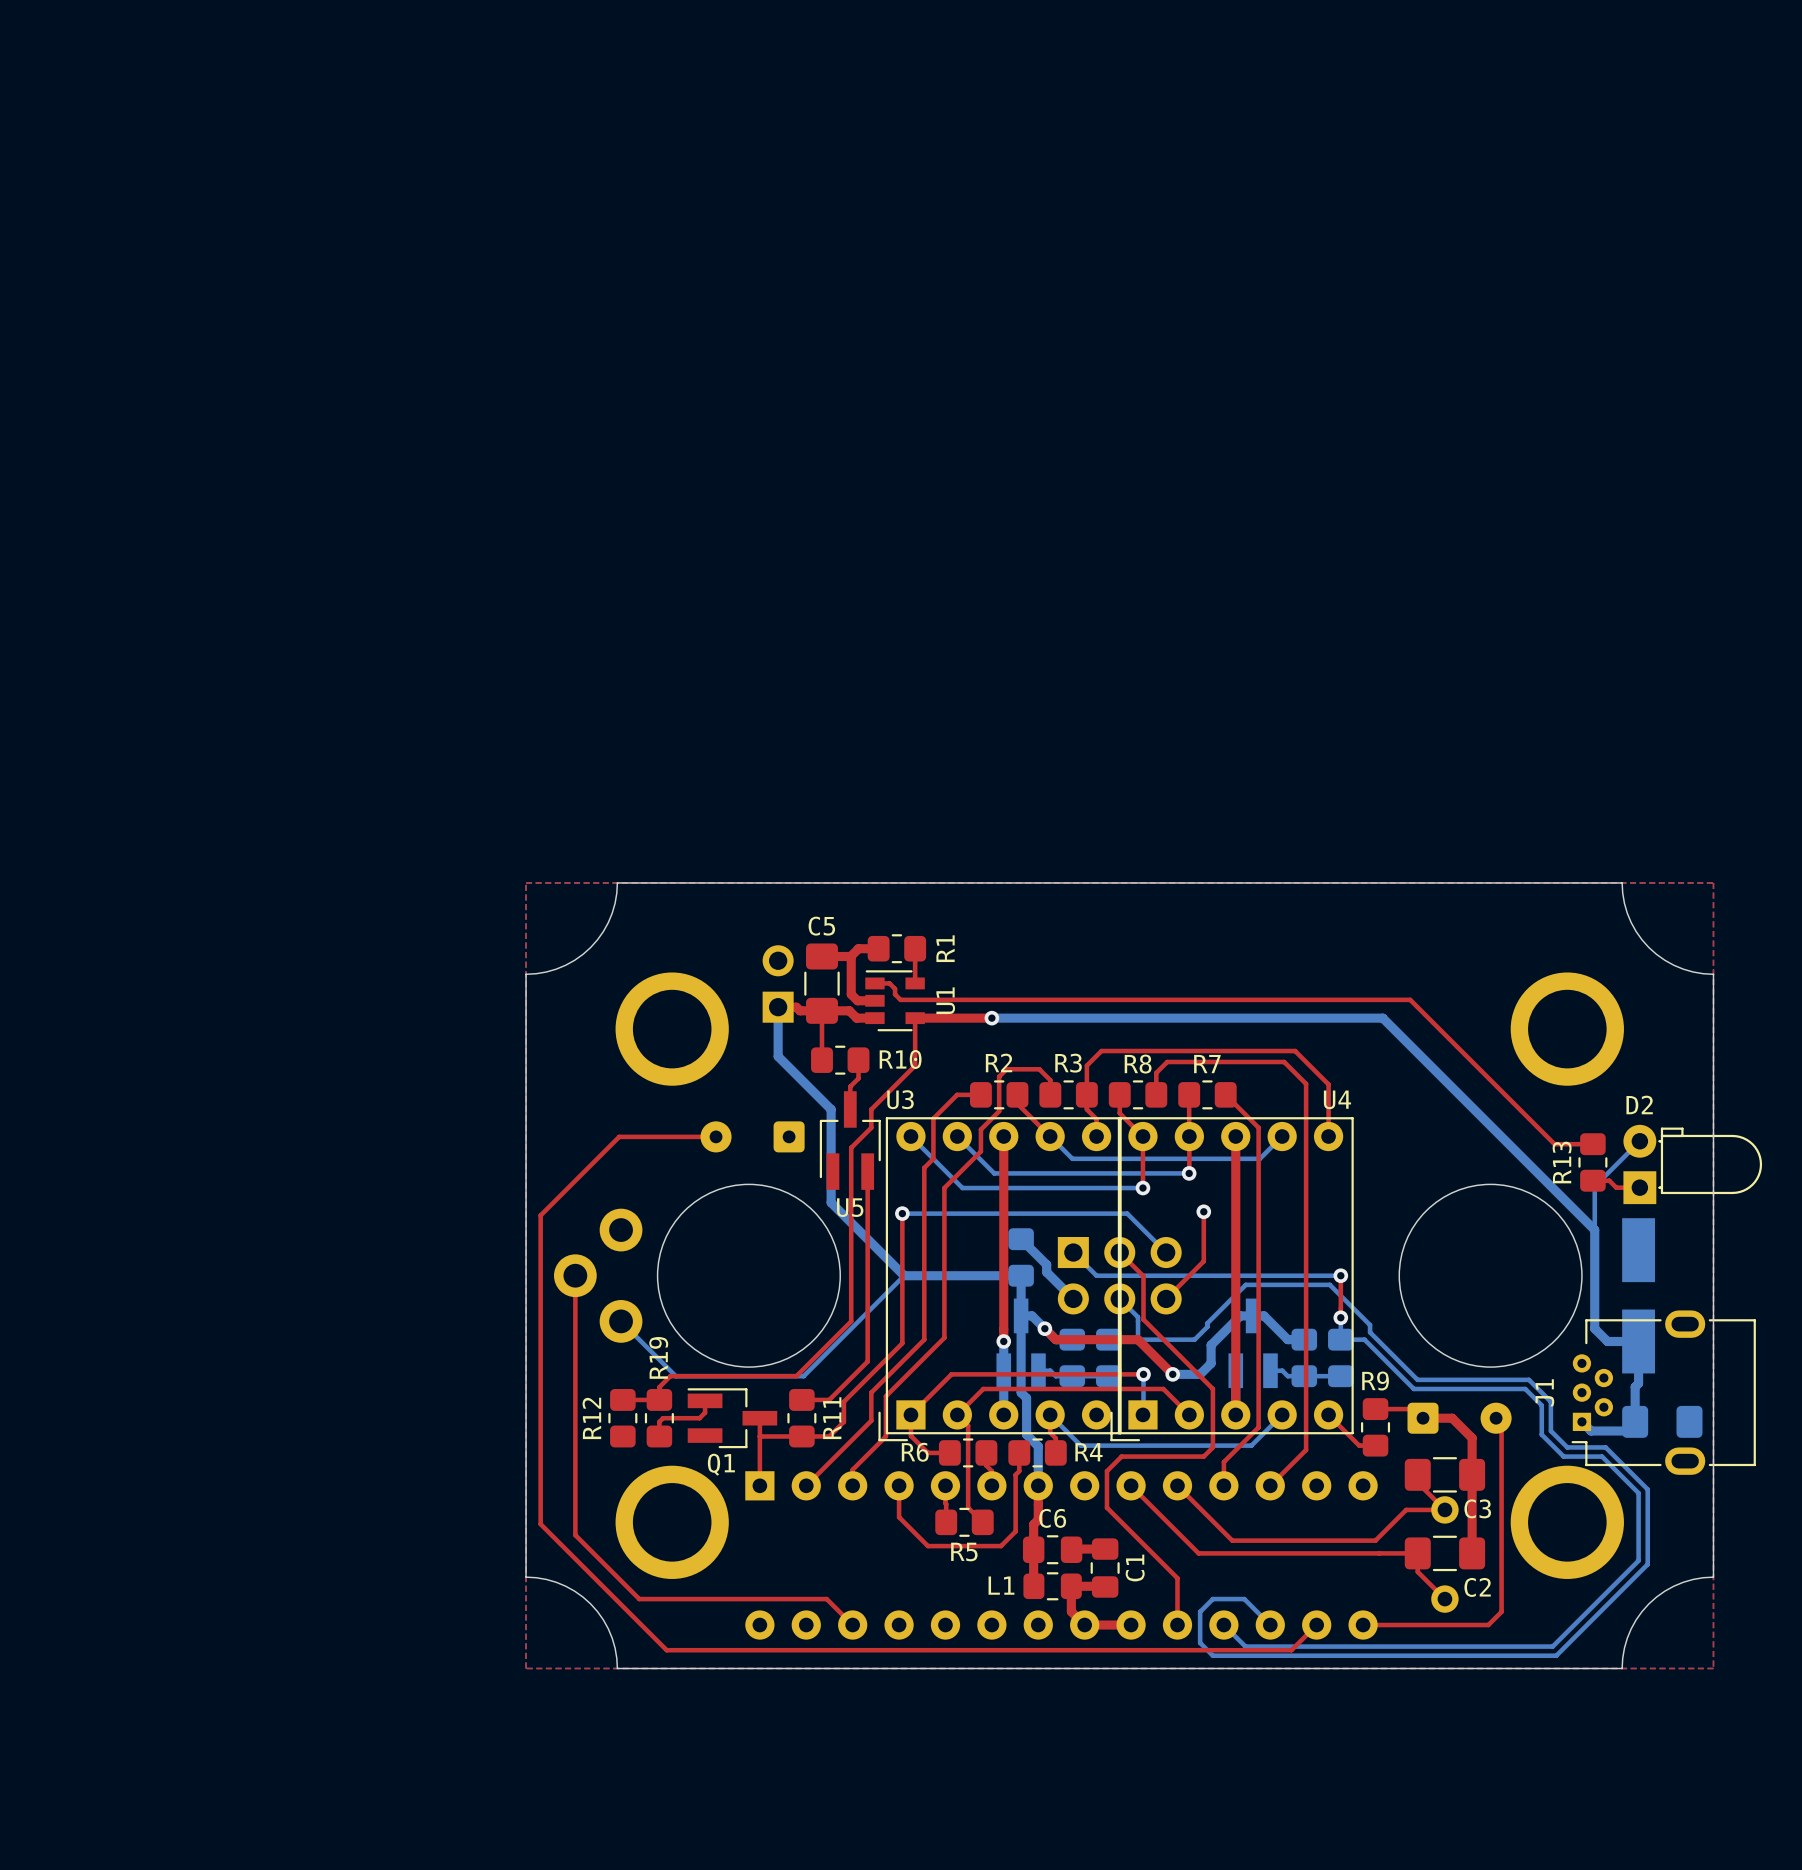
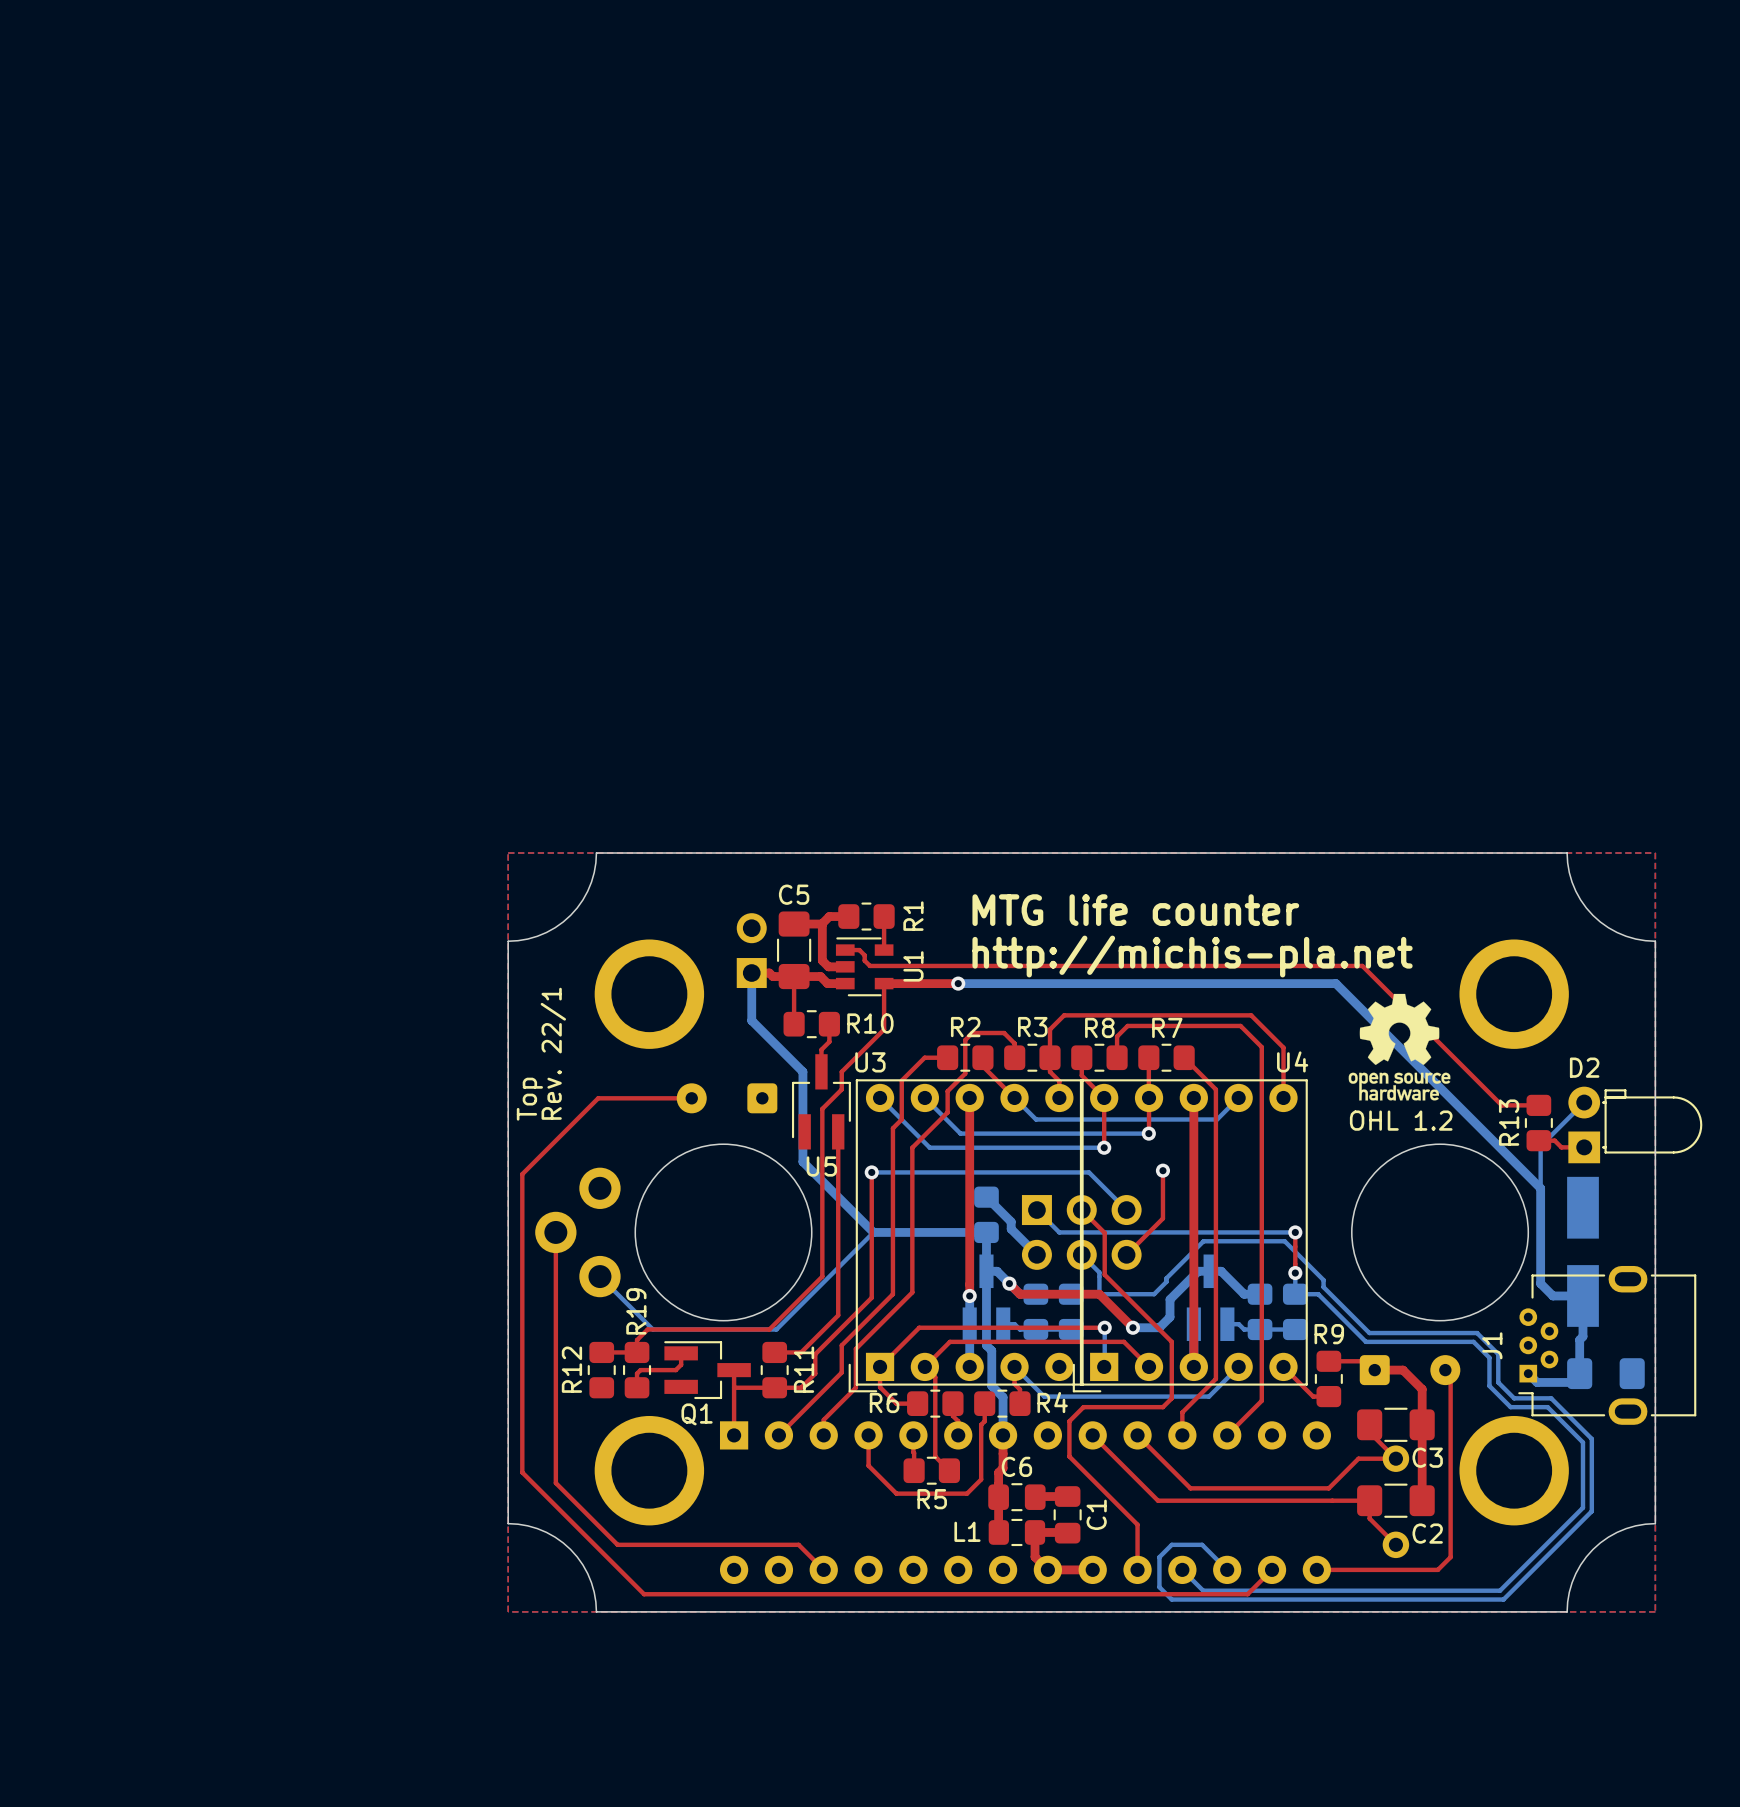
text: none -> MTG life counter (1135, 910)
text: none -> http://michis-pla.net (1192, 956)
drawing: none -> [1348, 993, 1451, 1101]
text: none -> Rev. 22/1 (553, 1053)
text: none -> Top (529, 1099)
text: none -> OHL 1.2 (1401, 1120)

